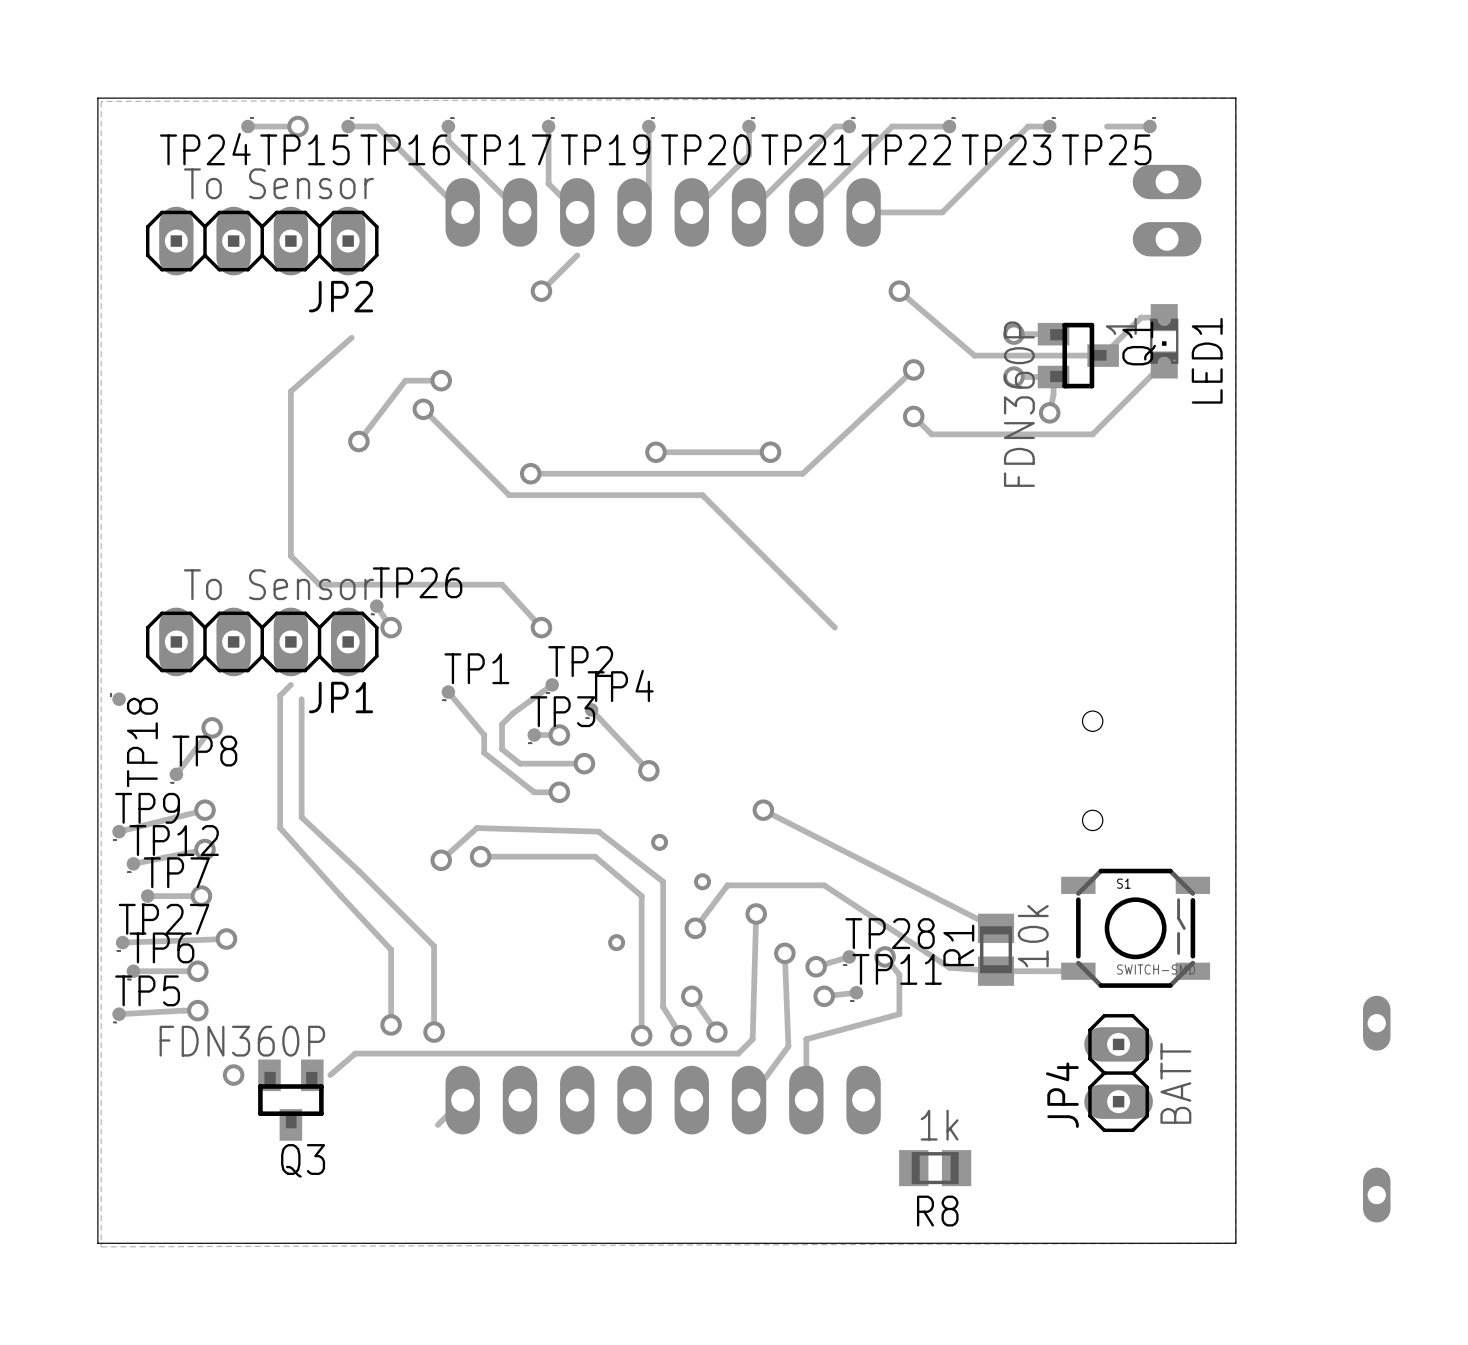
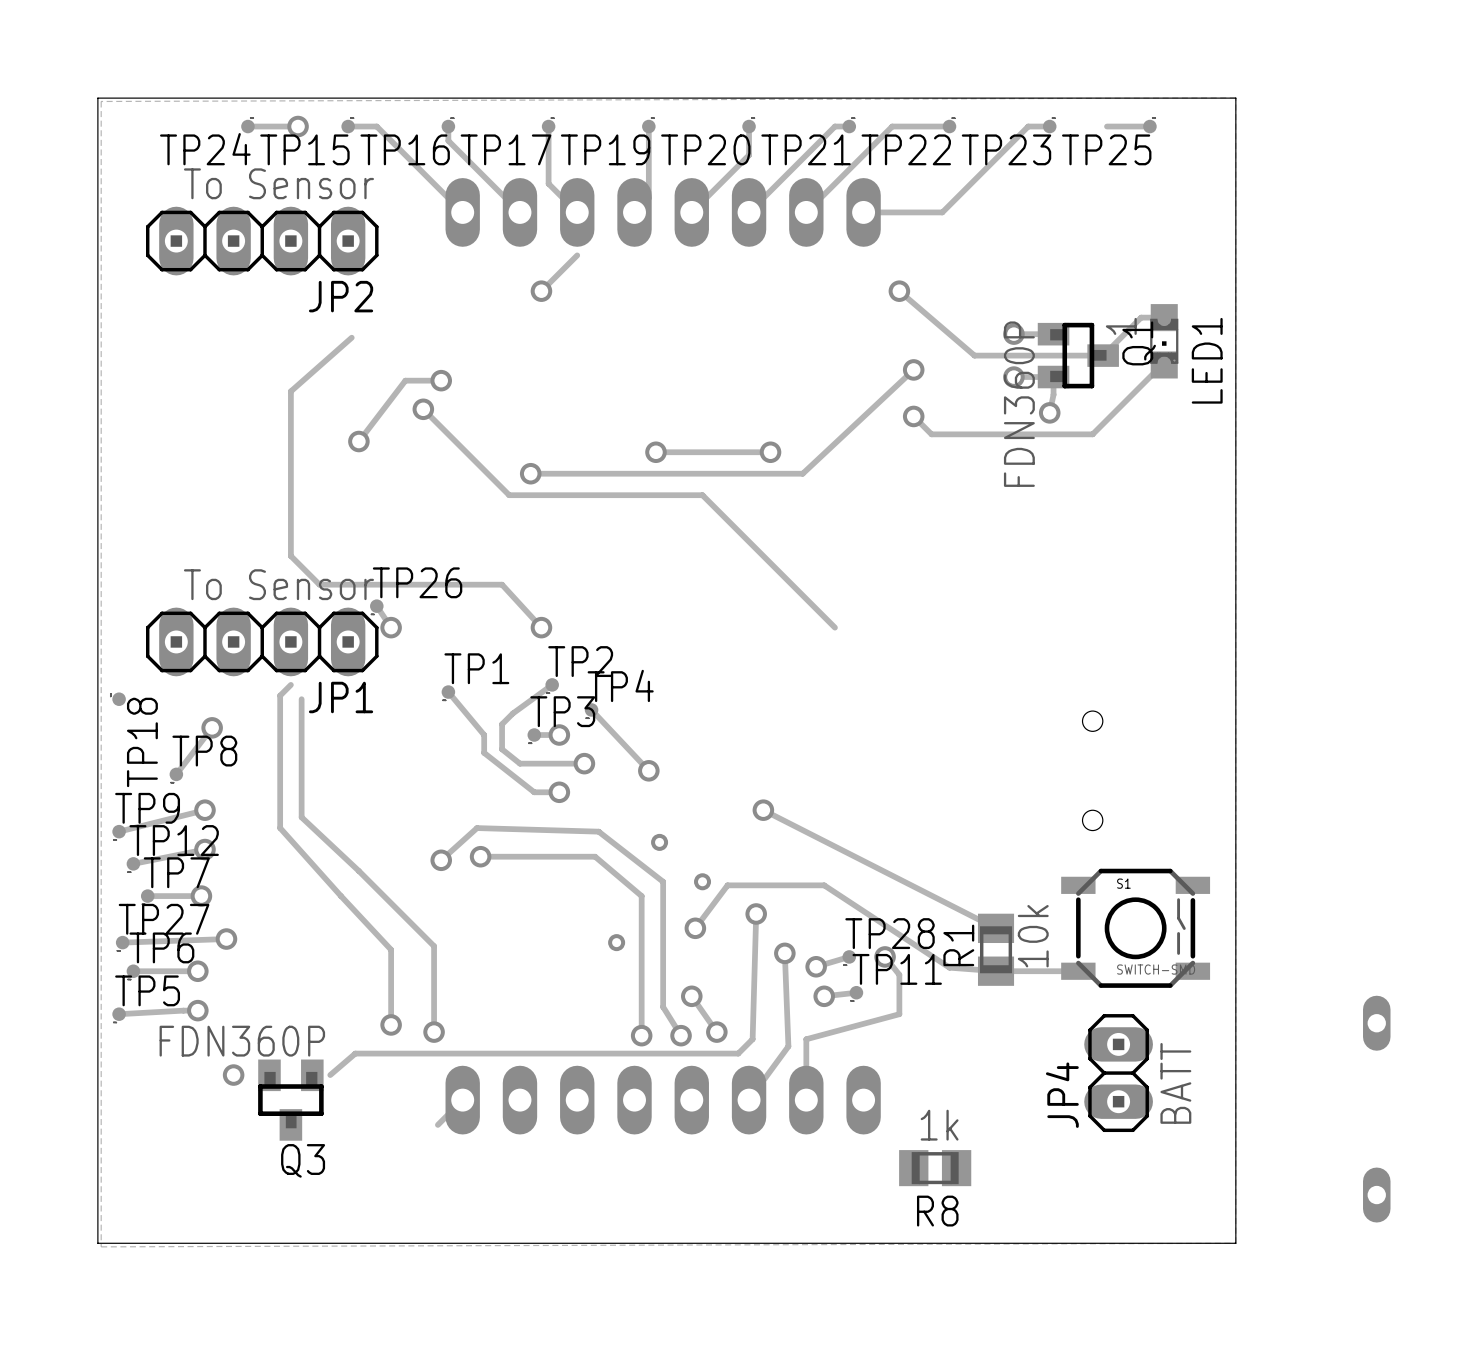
part: (1167, 210) -> none

